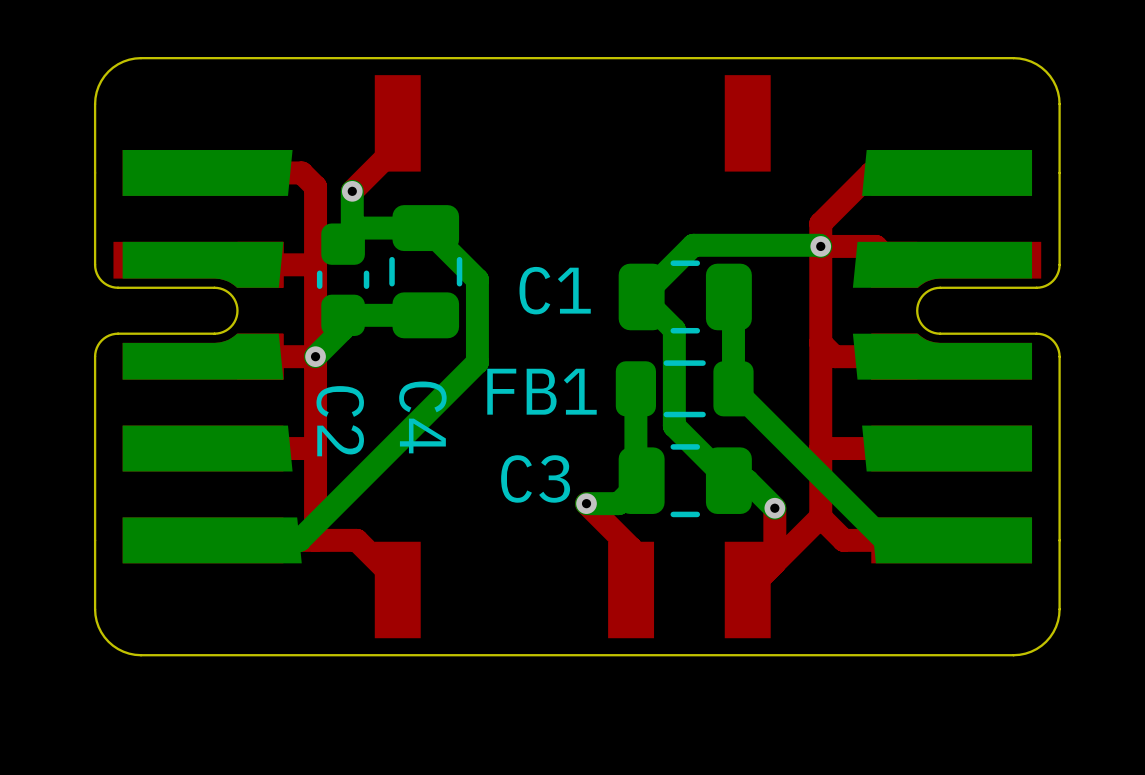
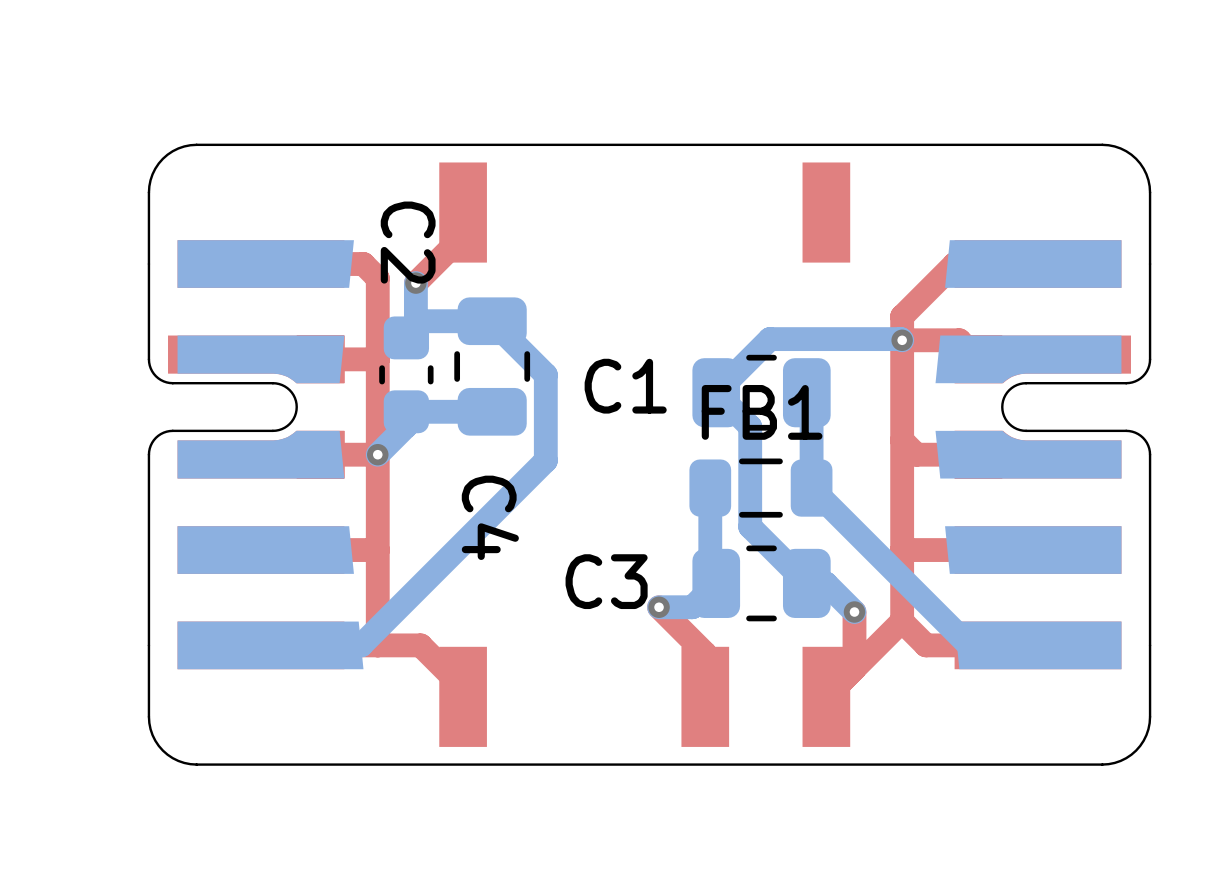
FB1 name position: FB1 (542, 391) -> FB1 (762, 412)
C2 name position: C2 (340, 421) -> C2 (408, 242)

